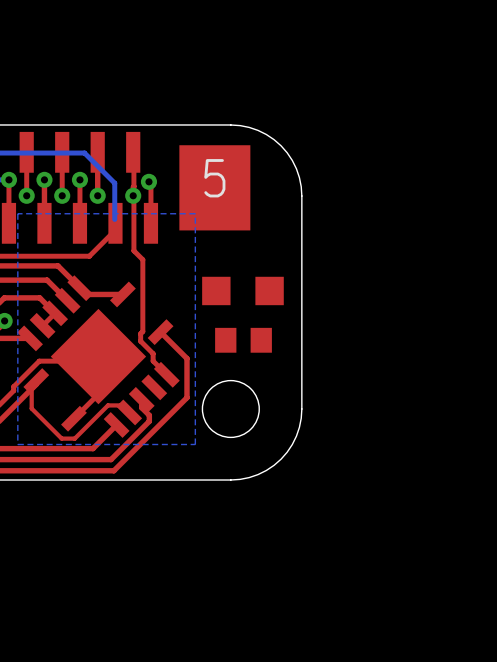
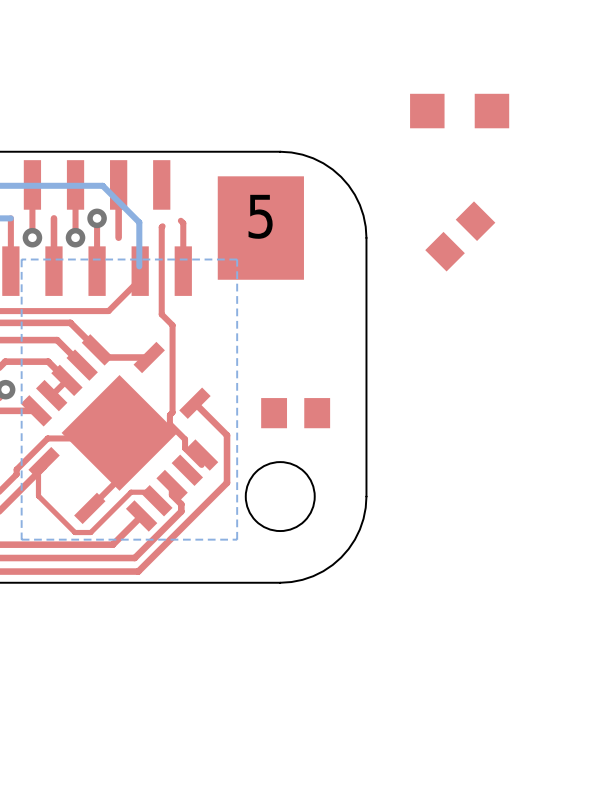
part: none -> (459, 111)
top track: (133, 152) (133, 250) (142, 259) (142, 331) (140, 333) (140, 341) (153, 353) (153, 361) (166, 374) -> none
via: (8, 179) -> none
via: (44, 179) -> none
via: (148, 181) -> none
part: none -> (460, 236)
via: (97, 195) -> none
top track: none -> (161, 237) (161, 314) (172, 325) (172, 412) (169, 415) (169, 424) (185, 439) (185, 448) (201, 464)
via: (133, 195) -> none
part: (242, 290) -> none

